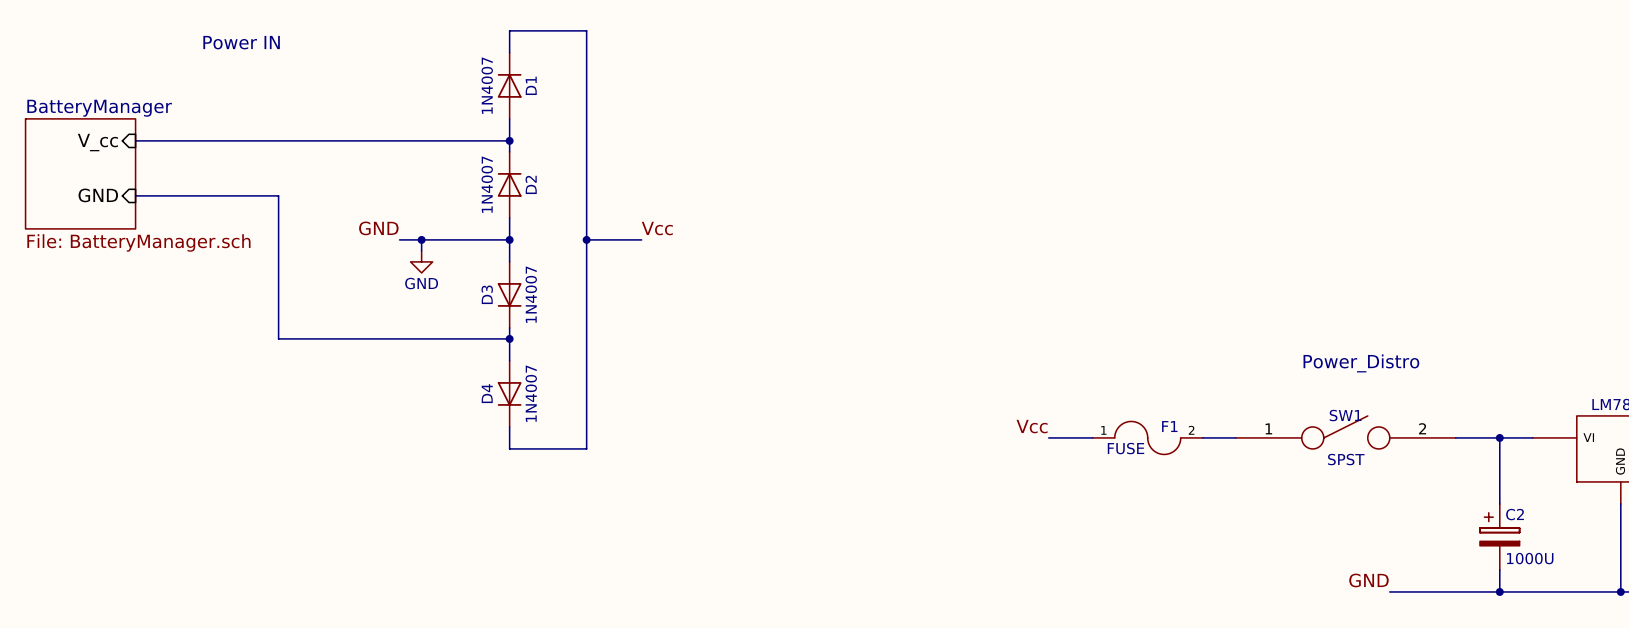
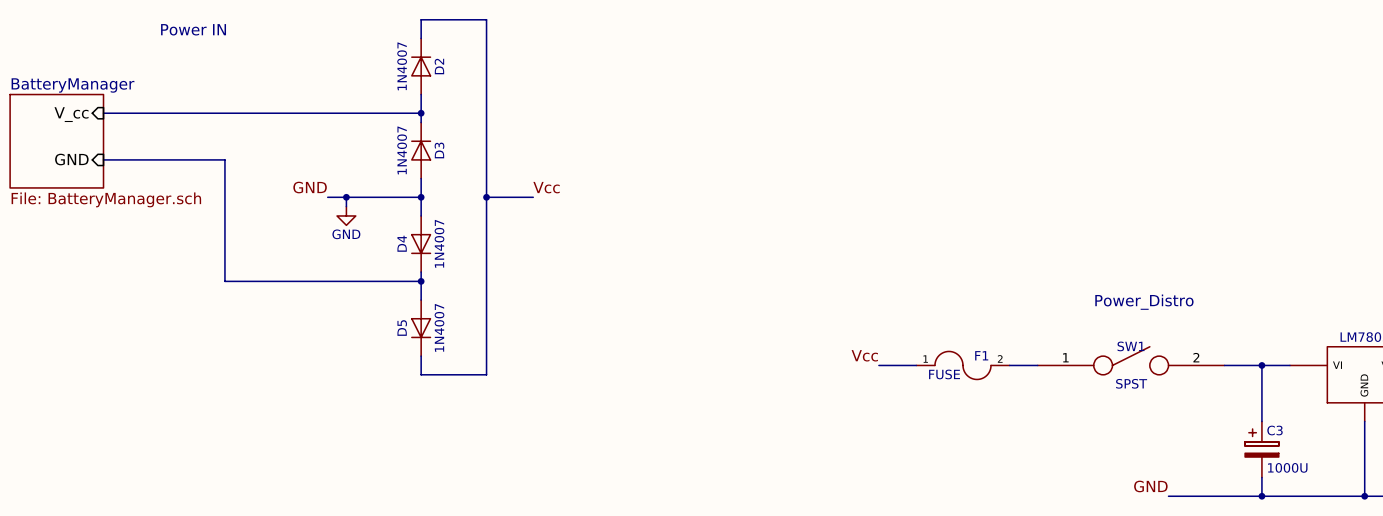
D1 name: D1 (531, 85) -> D2 (439, 66)
D2 name: D2 (531, 184) -> D3 (439, 150)
D3 name: D3 (487, 294) -> D4 (402, 243)
D4 name: D4 (487, 393) -> D5 (402, 328)
C2 name: C2 (1515, 514) -> C3 (1275, 430)

